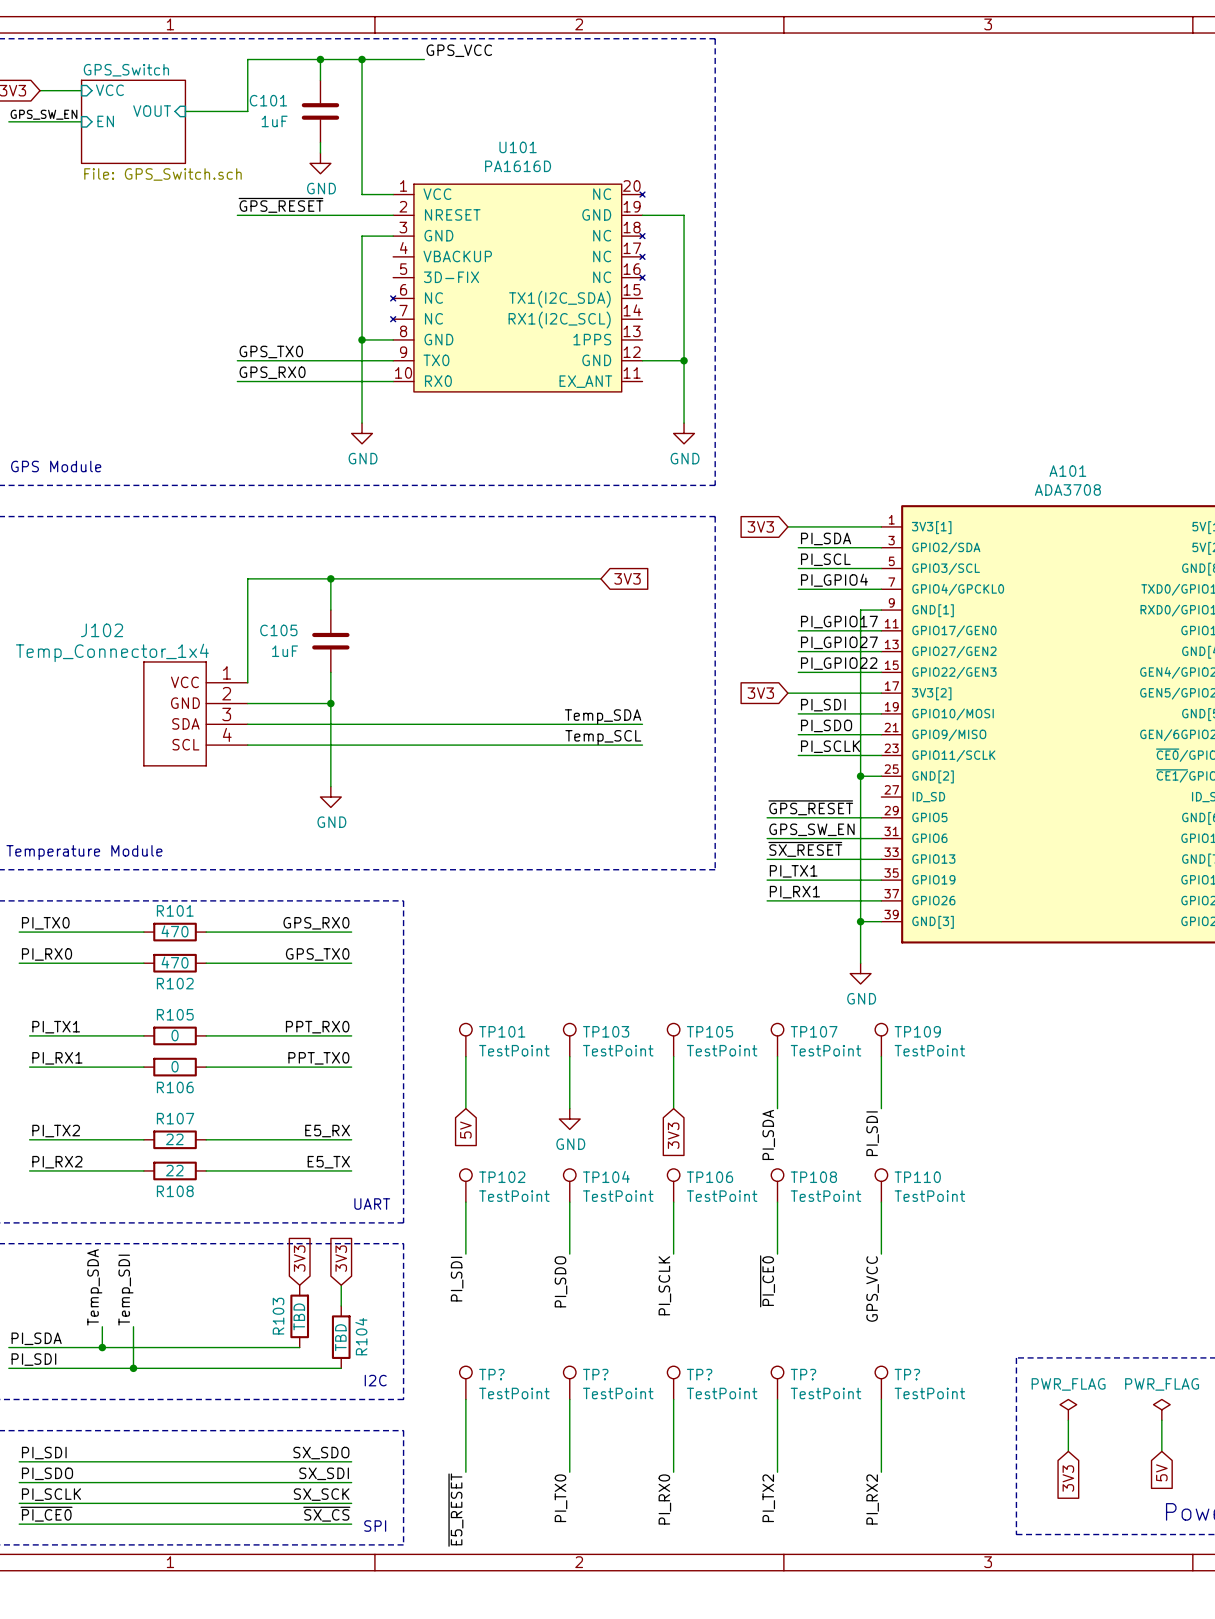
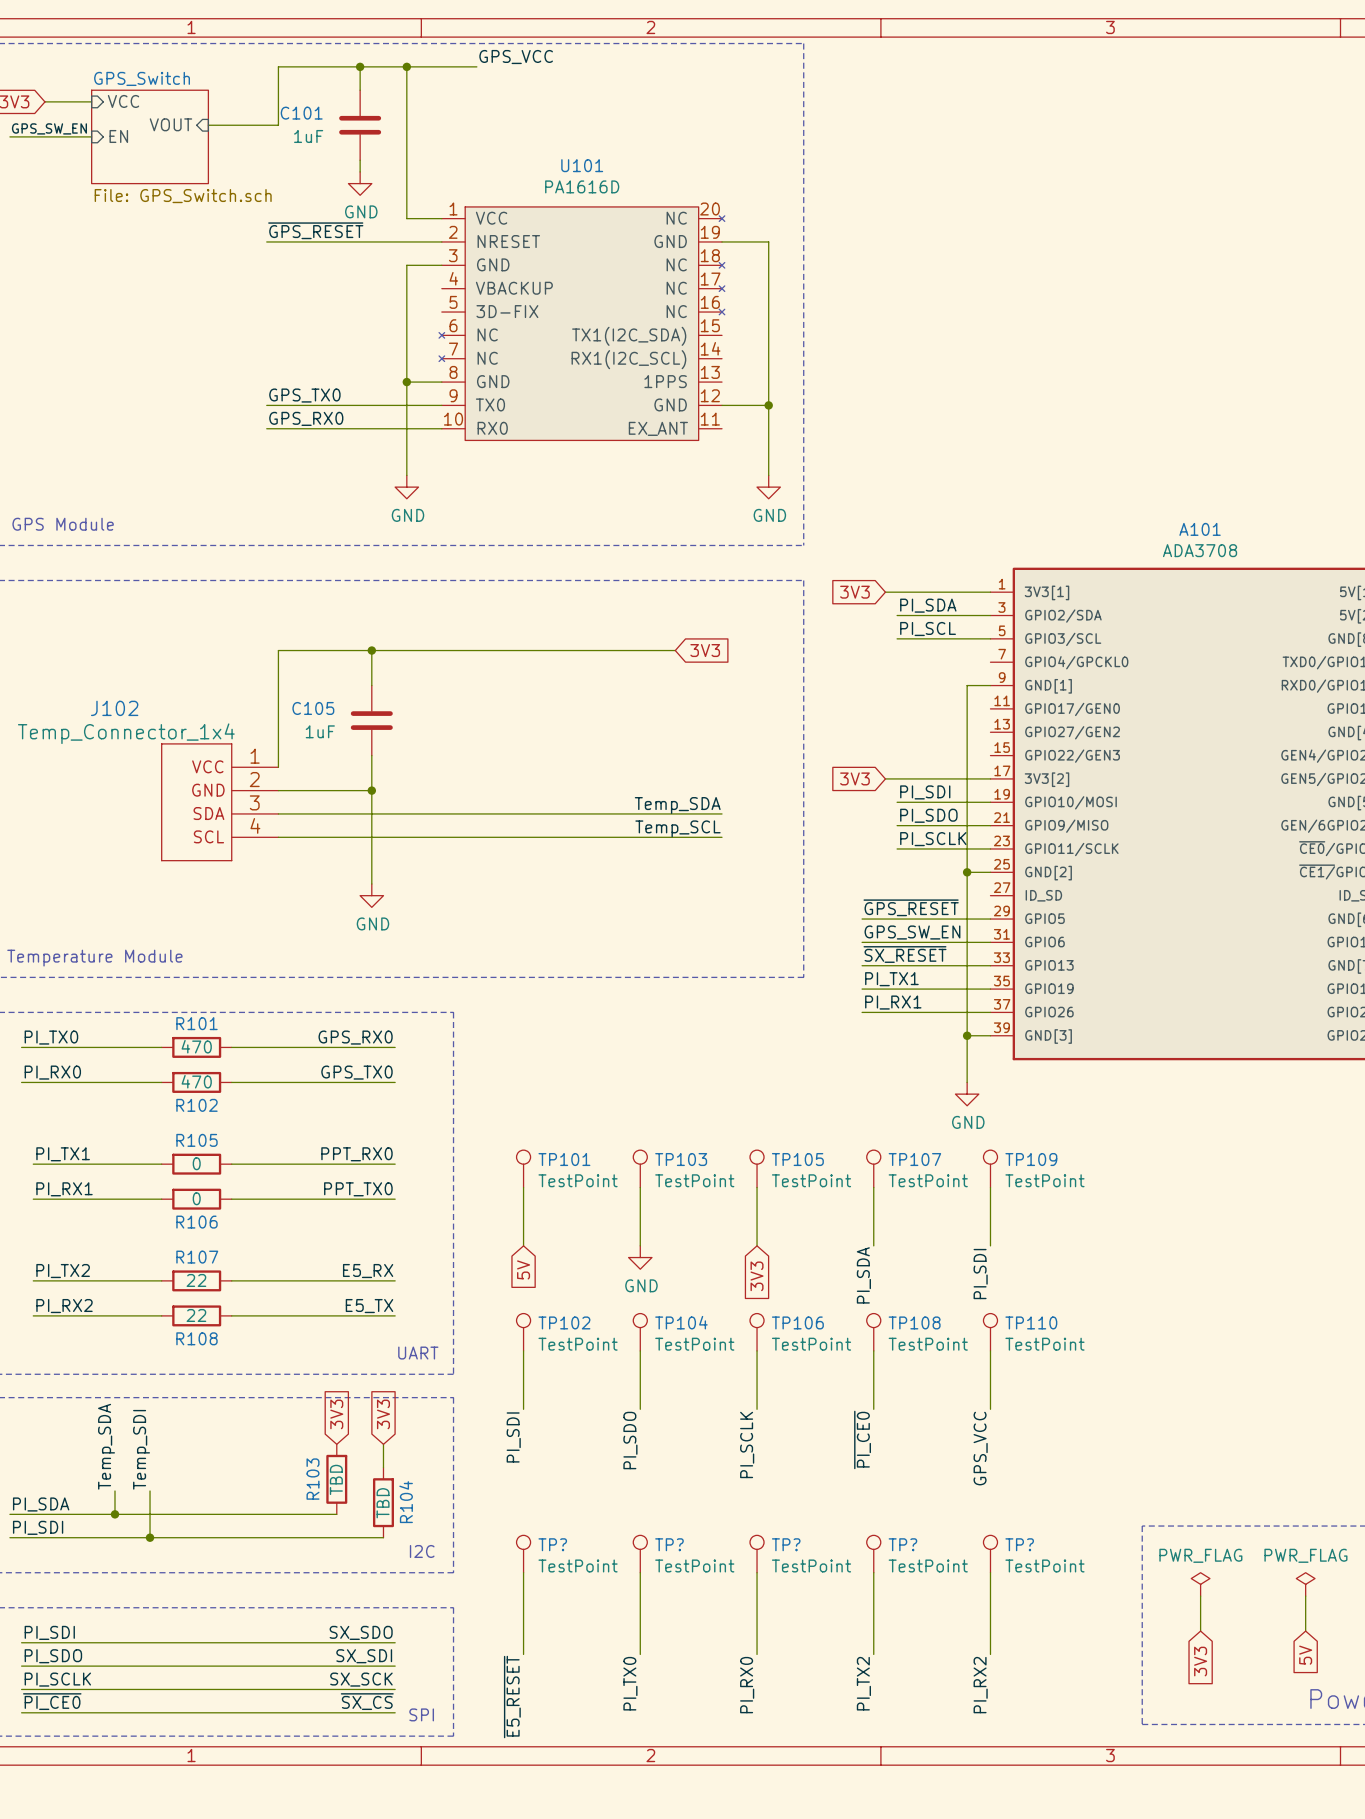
label: PI_GPIO4 (834, 580) -> none
wire: (798, 589) (881, 589) -> none
label: PI_GPIO17 (839, 622) -> none
wire: (798, 630) (881, 630) -> none
label: PI_GPIO27 (839, 642) -> none
wire: (798, 651) (881, 651) -> none
label: PI_GPIO22 (839, 663) -> none
wire: (798, 672) (881, 672) -> none

